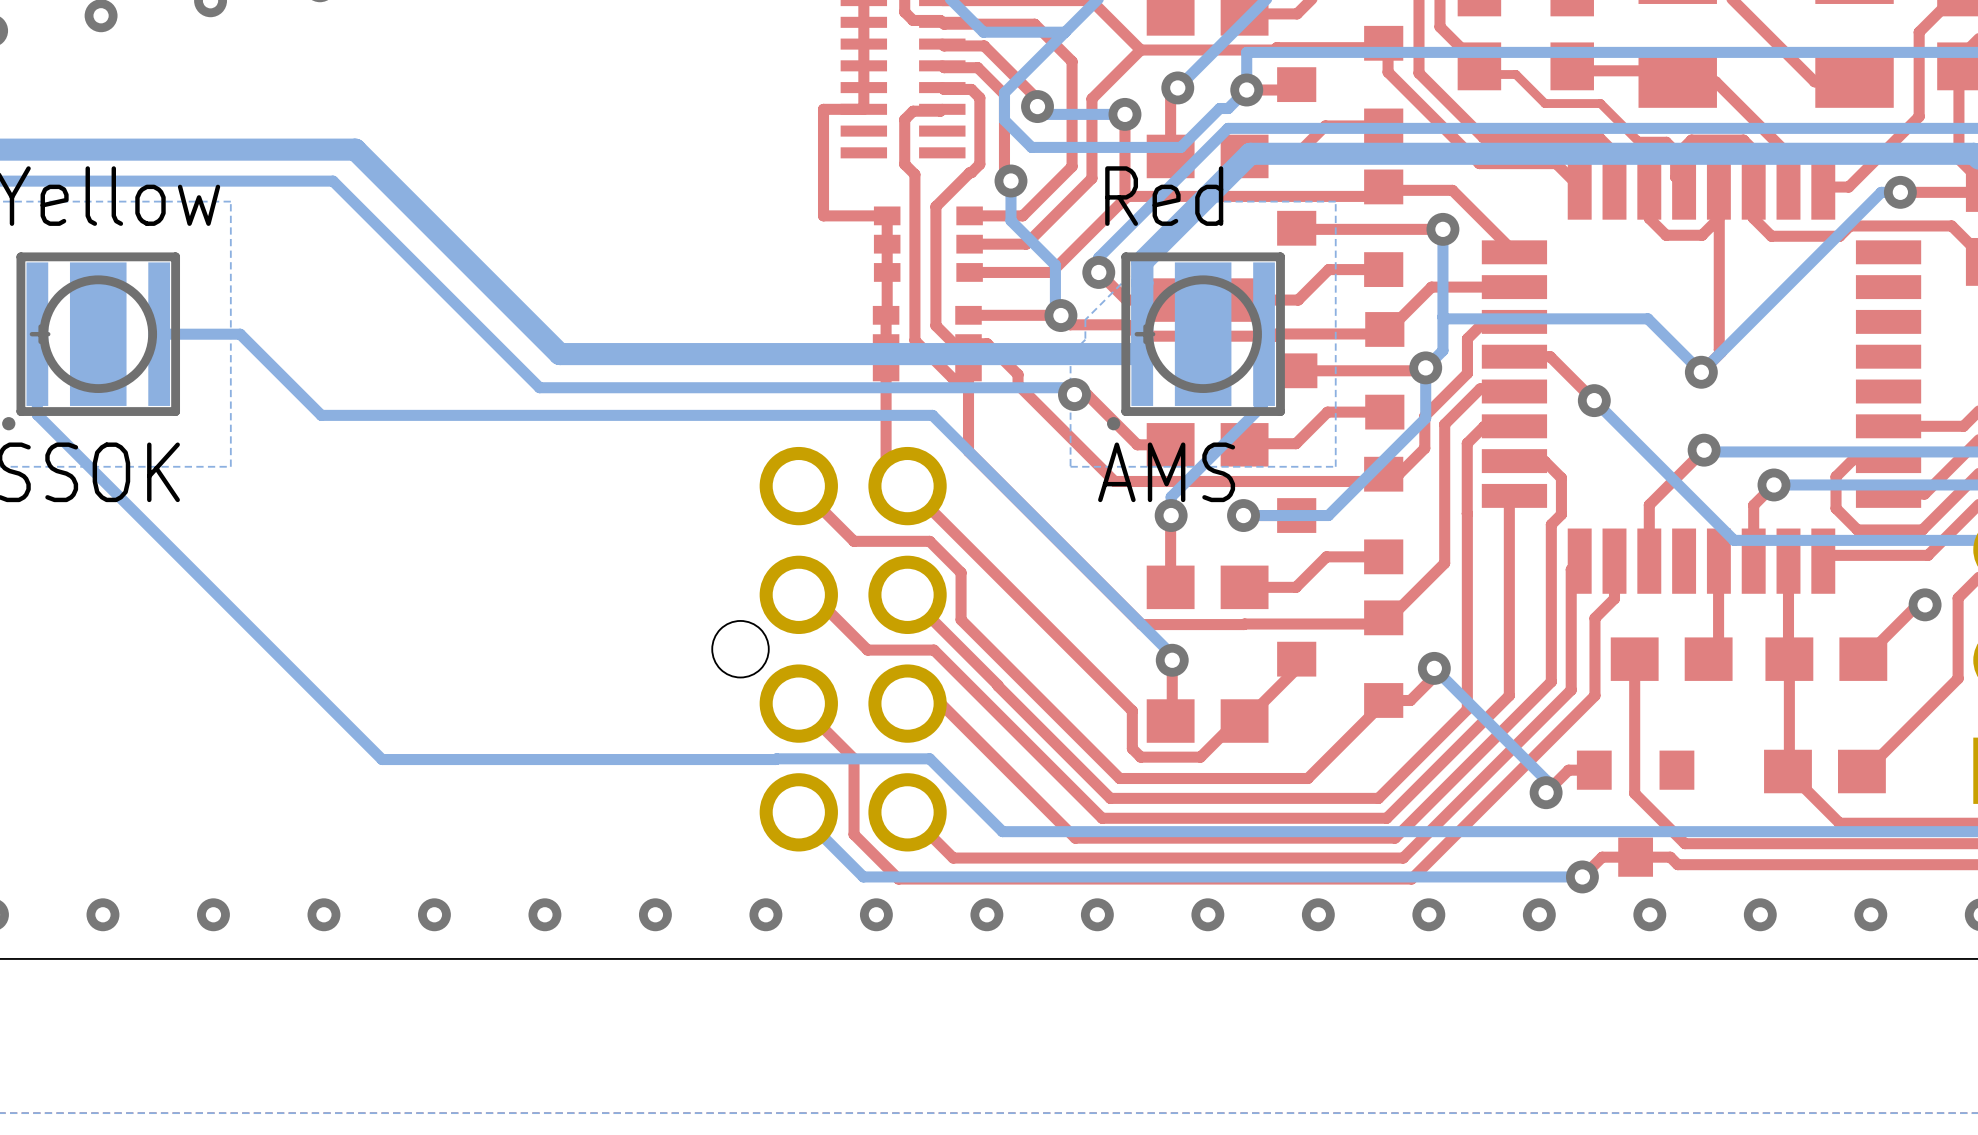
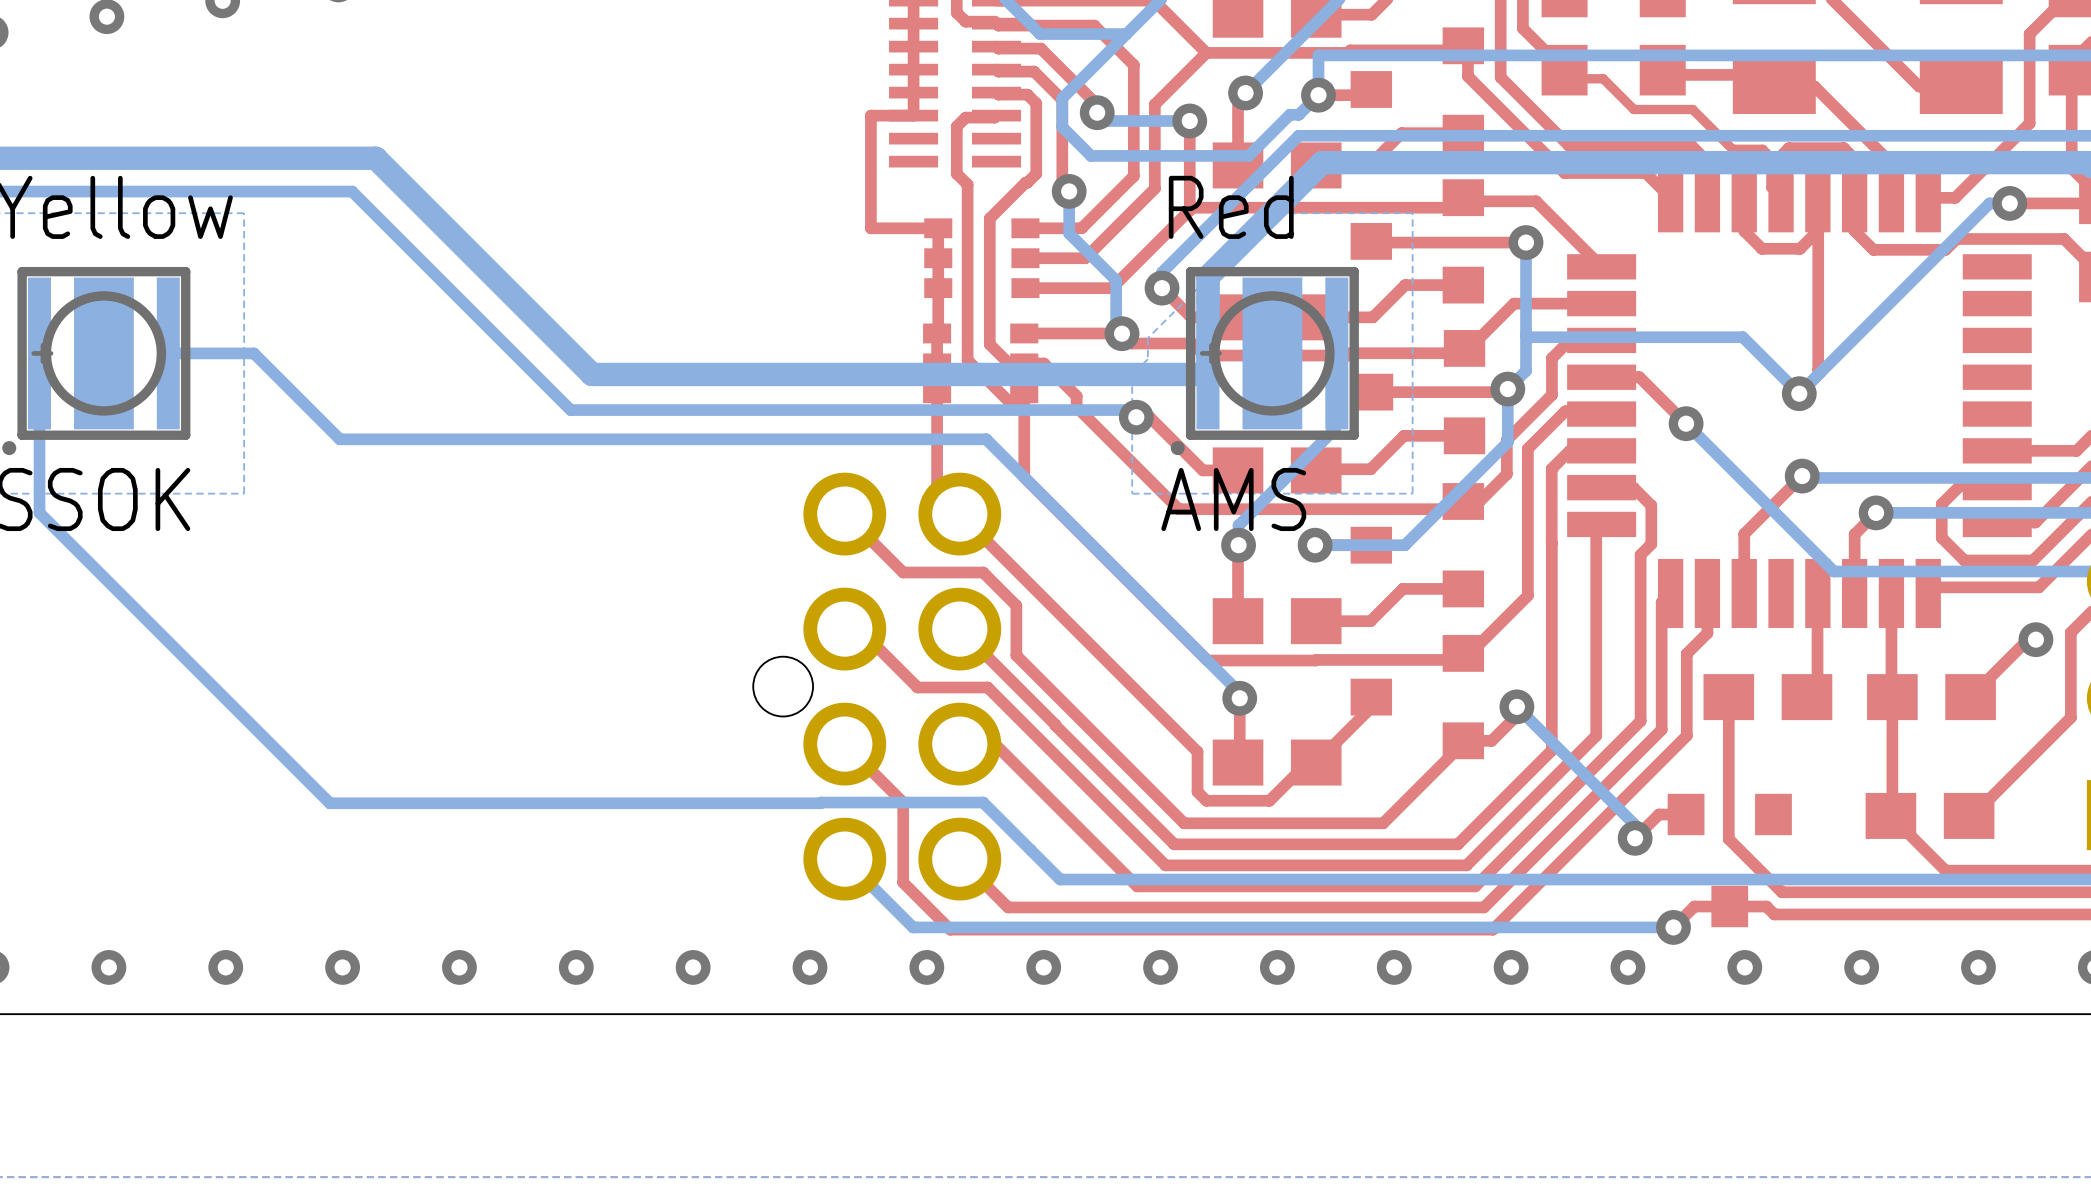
bottom track: (37, 414) (382, 759) -> (39, 438) (39, 512) (329, 803) (404, 803)

